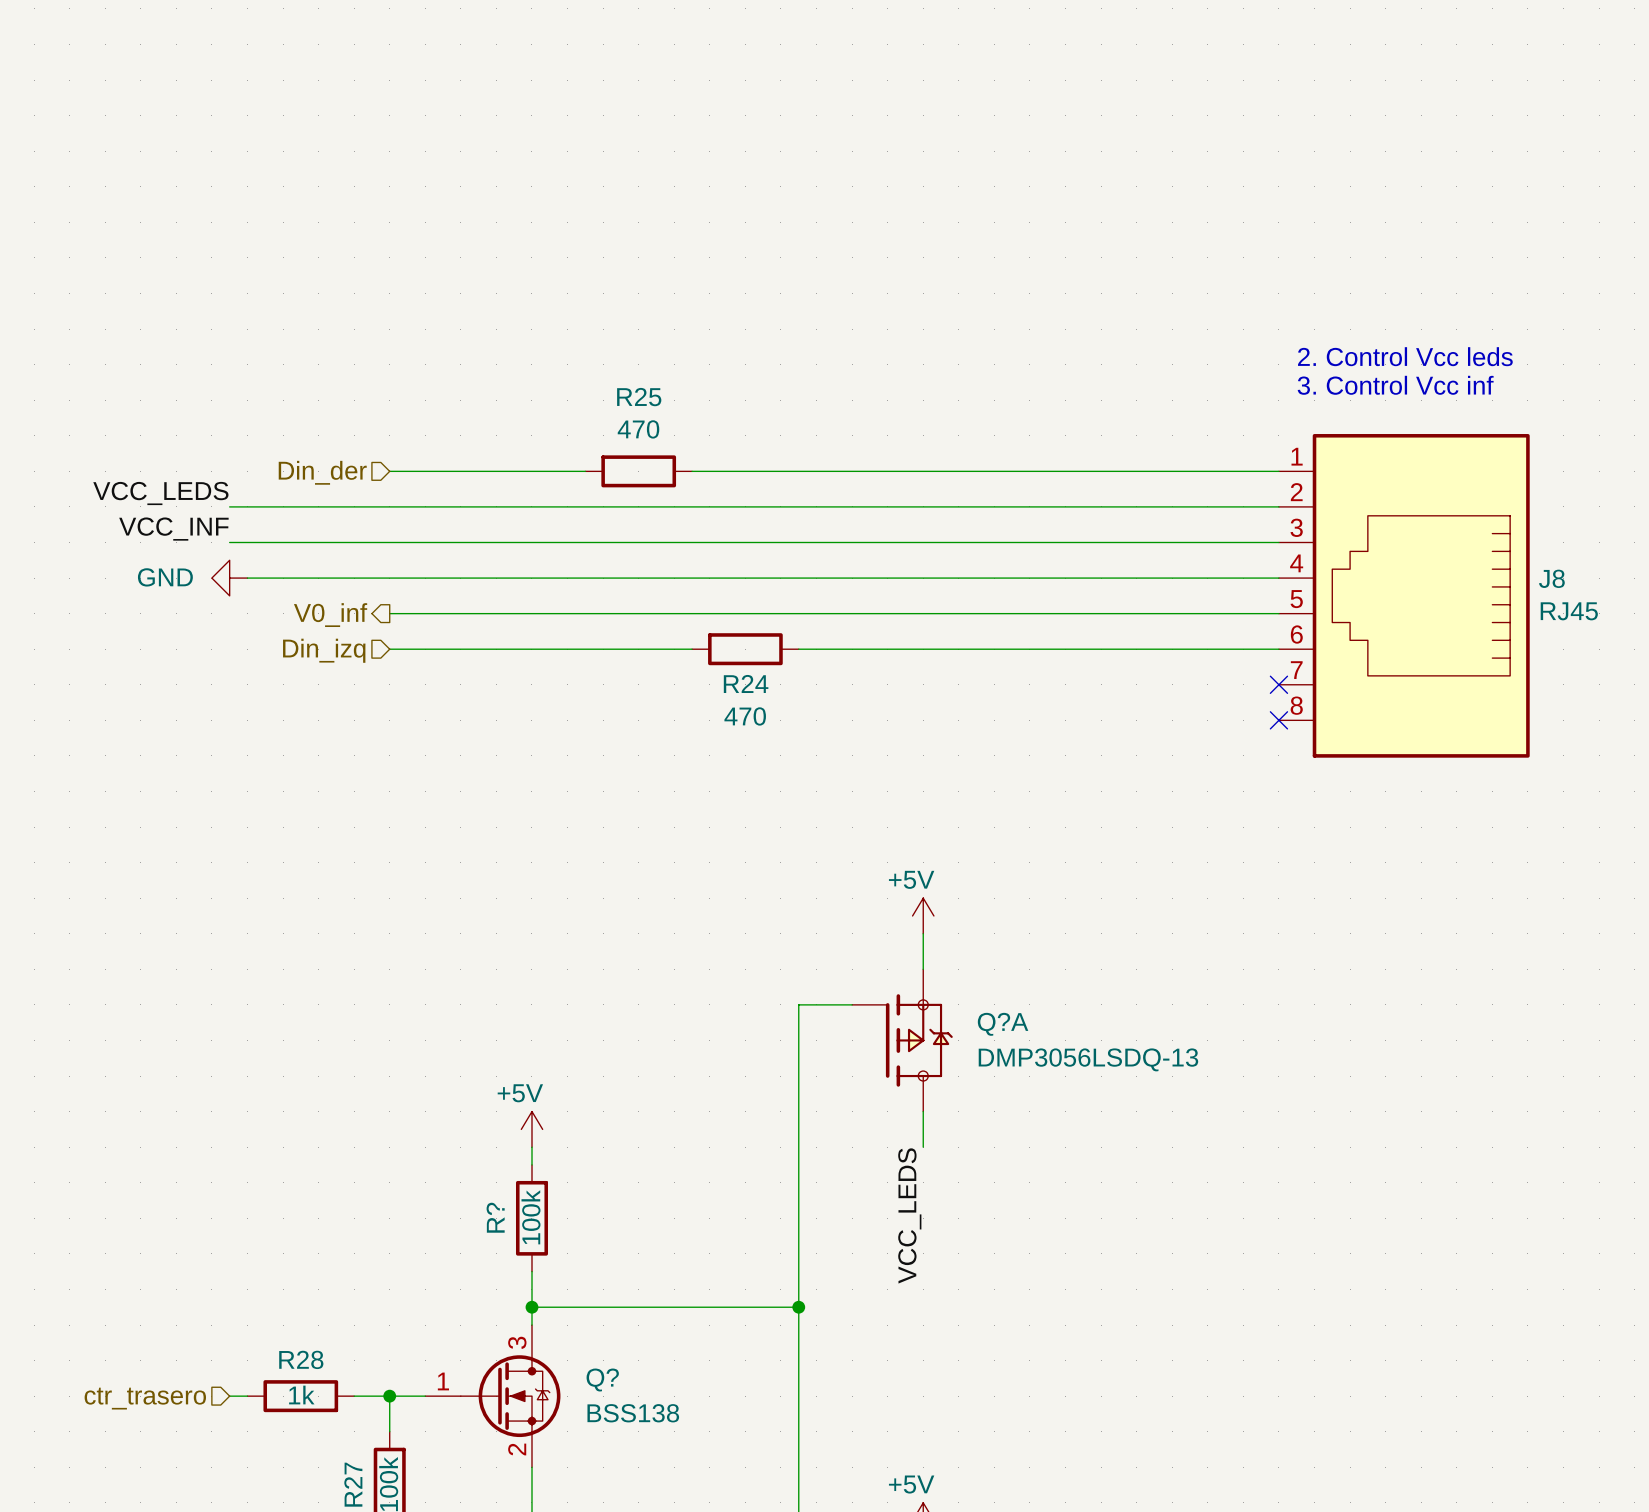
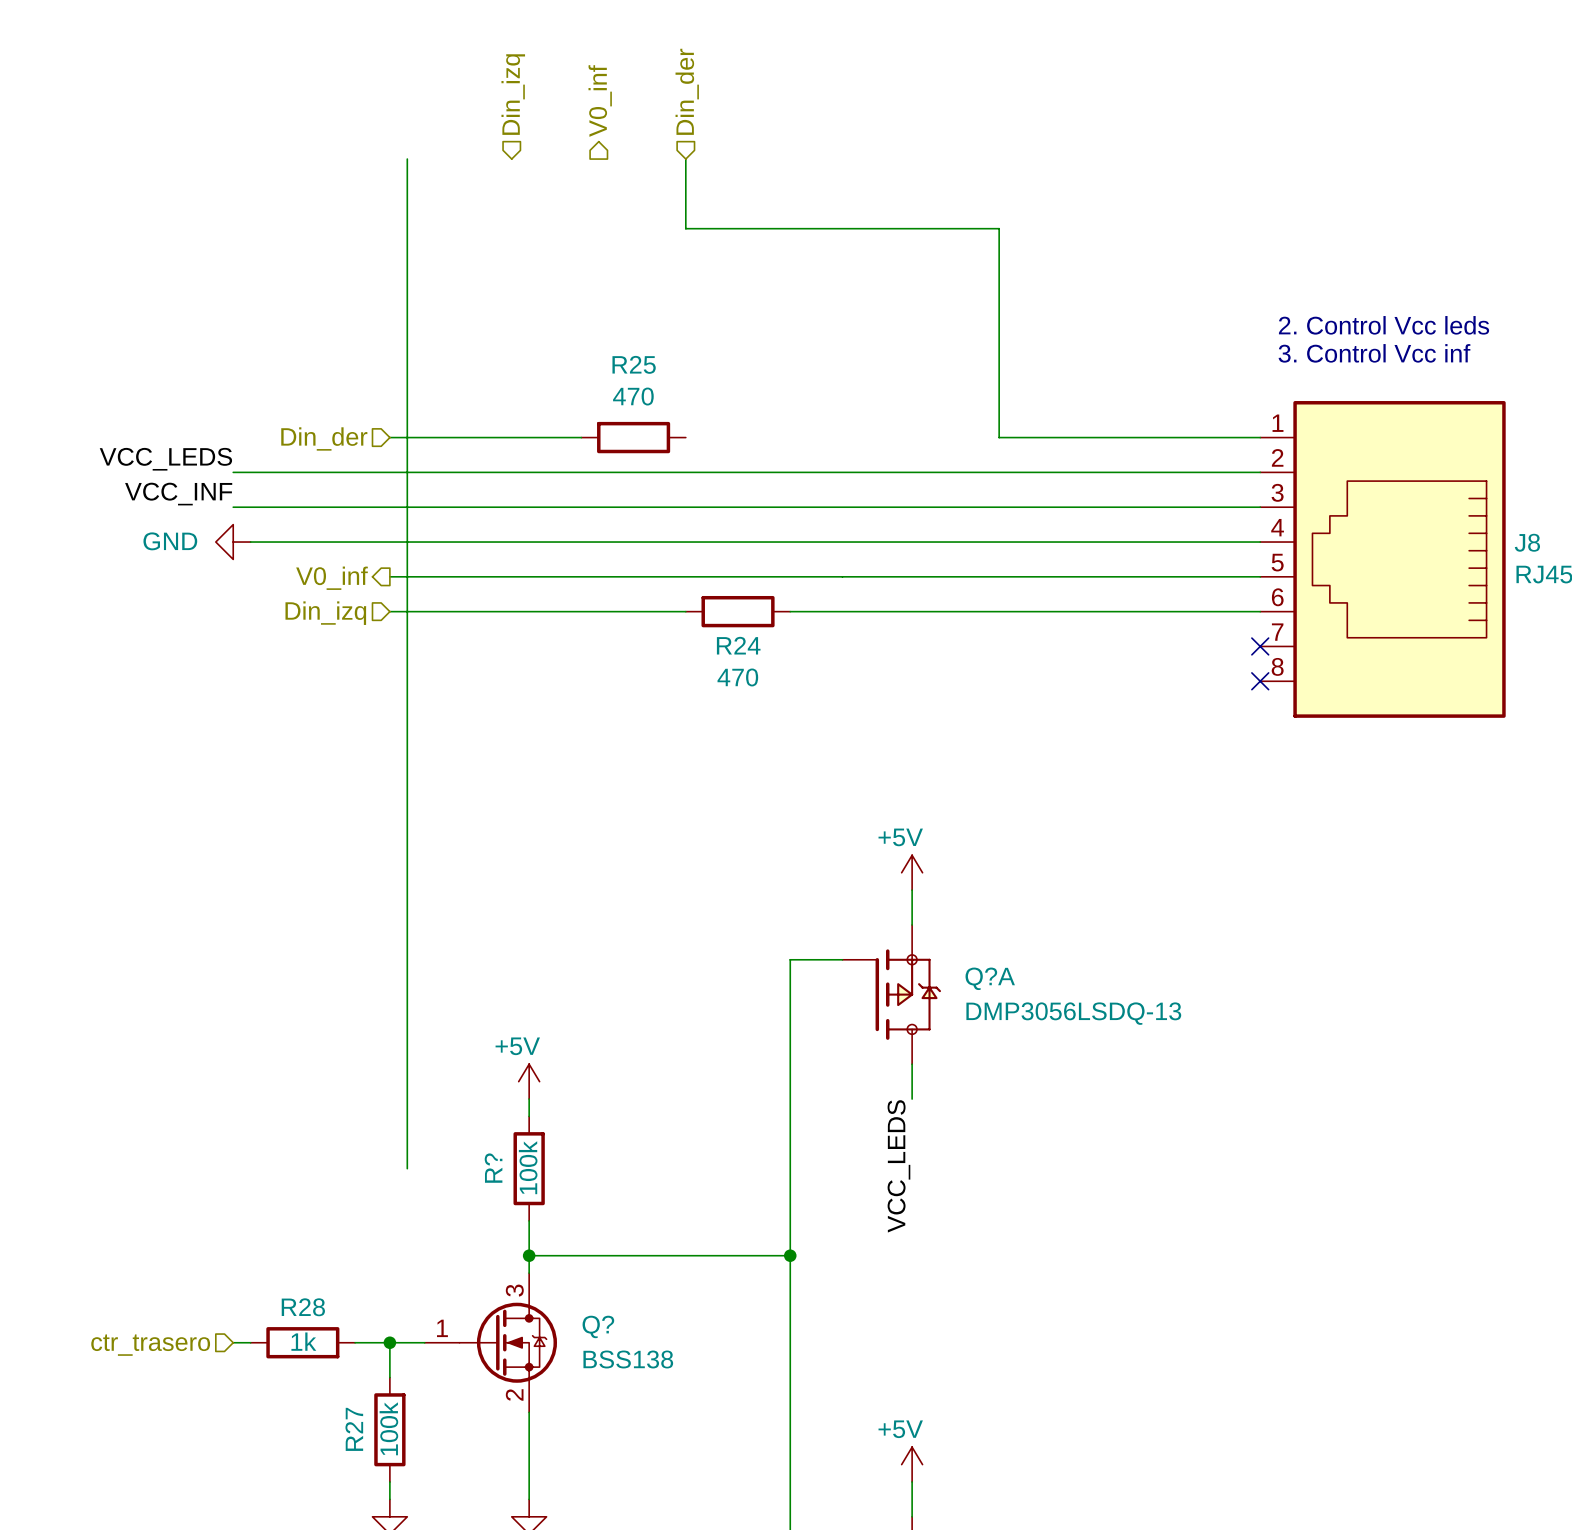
hierarchical label: none -> Din_der (687, 91)
hierarchical label: none -> Din_izq (513, 94)
hierarchical label: none -> V0_inf (600, 101)
wire: none -> (407, 159) (407, 1168)
wire: (692, 471) (1012, 471) -> (685, 159) (685, 228) (999, 228) (999, 437)

